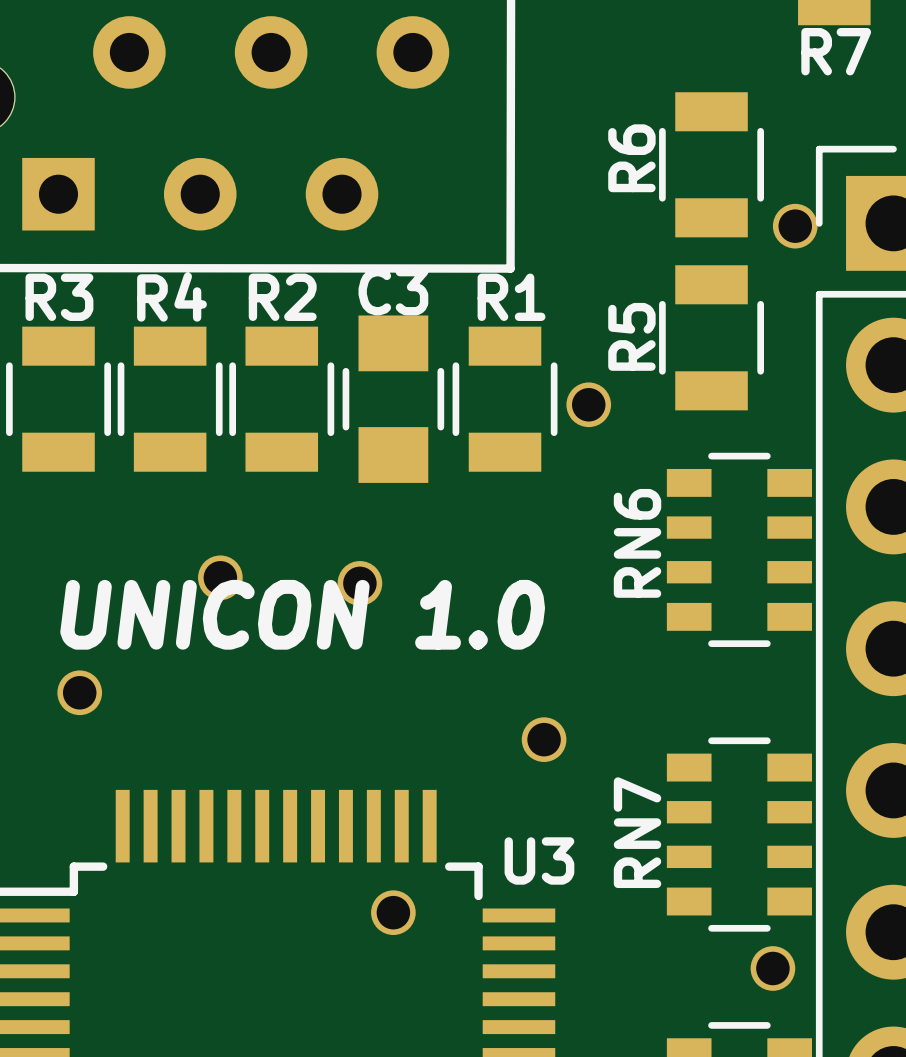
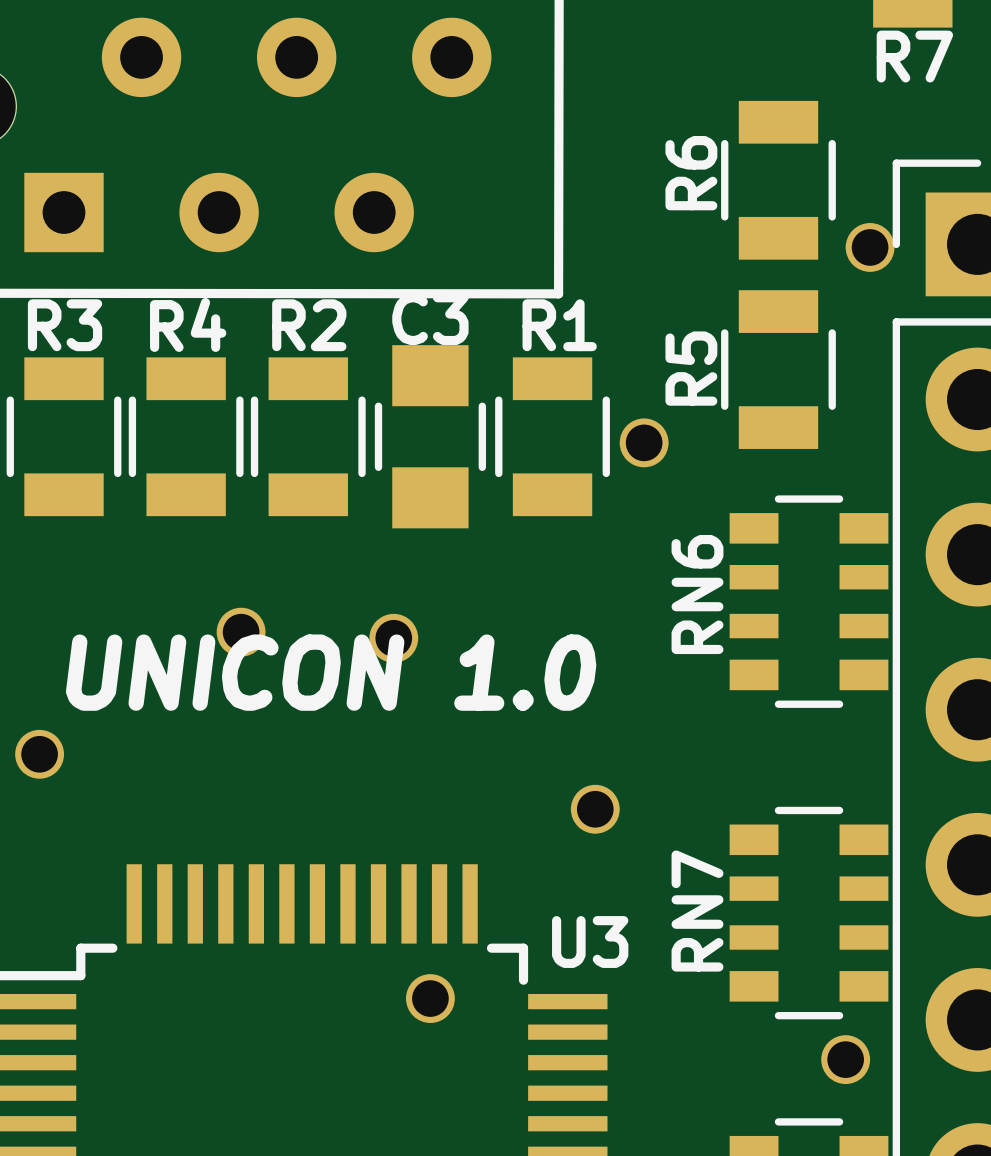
part position: (79, 692) -> (39, 754)

